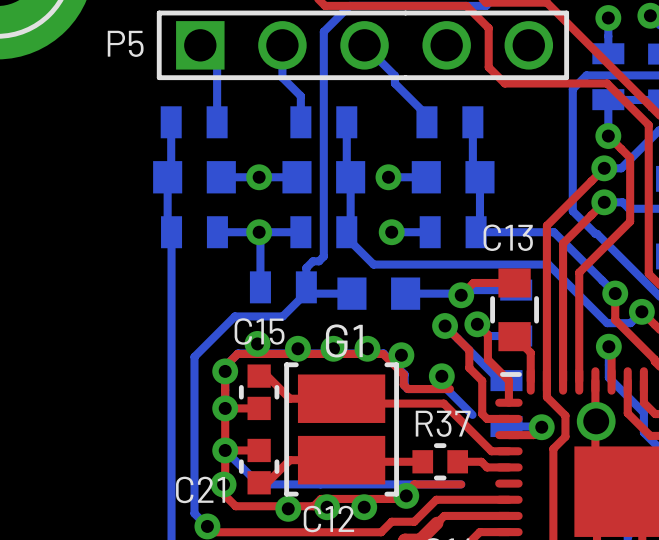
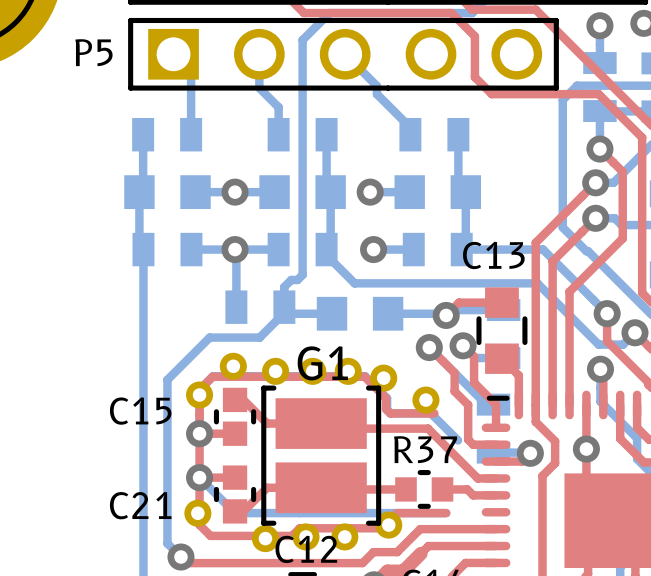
C15 name position: C15 (259, 331) -> C15 (140, 411)
part: (596, 421) -> none
via: none -> (586, 449)
C21 name position: C21 (200, 489) -> C21 (140, 505)

